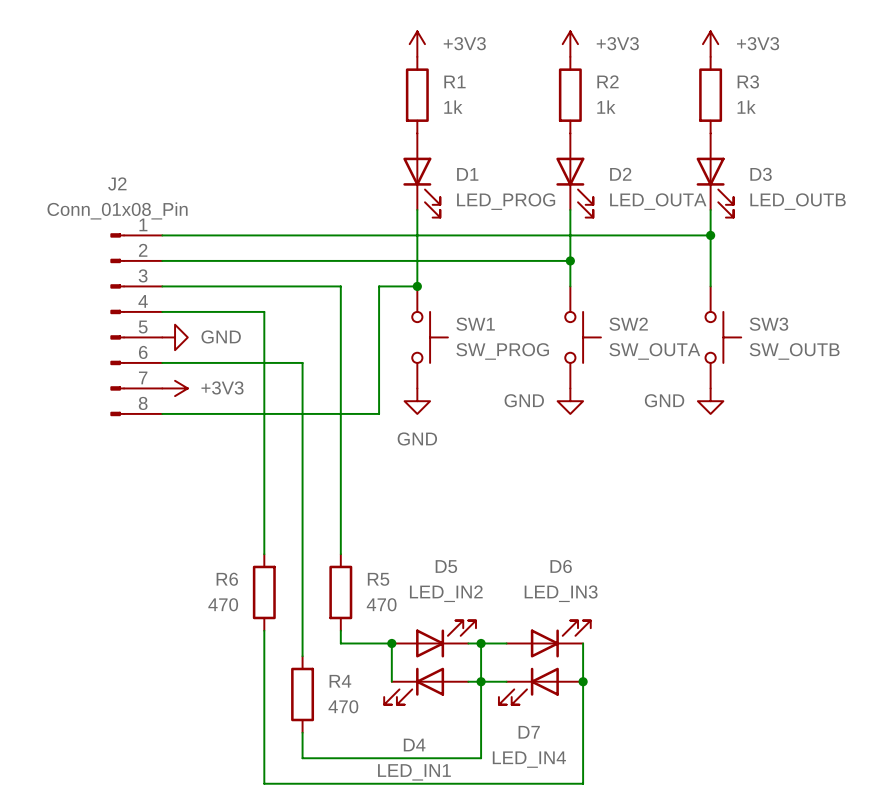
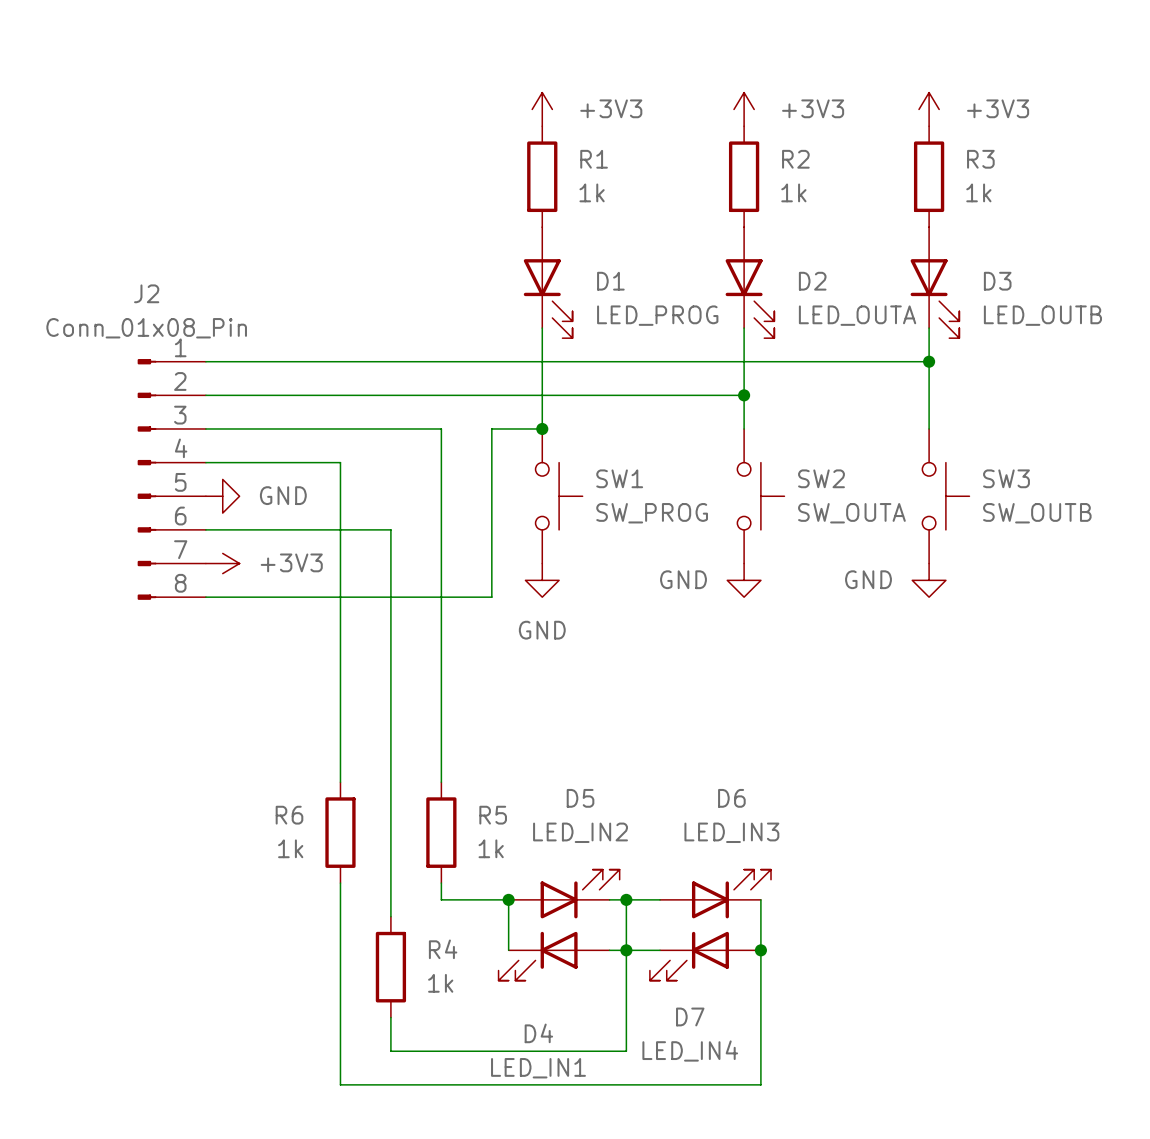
R6 value: 470 (223, 604) -> 1k (290, 848)
R5 value: 470 (381, 604) -> 1k (491, 848)
R4 value: 470 (343, 706) -> 1k (440, 983)

